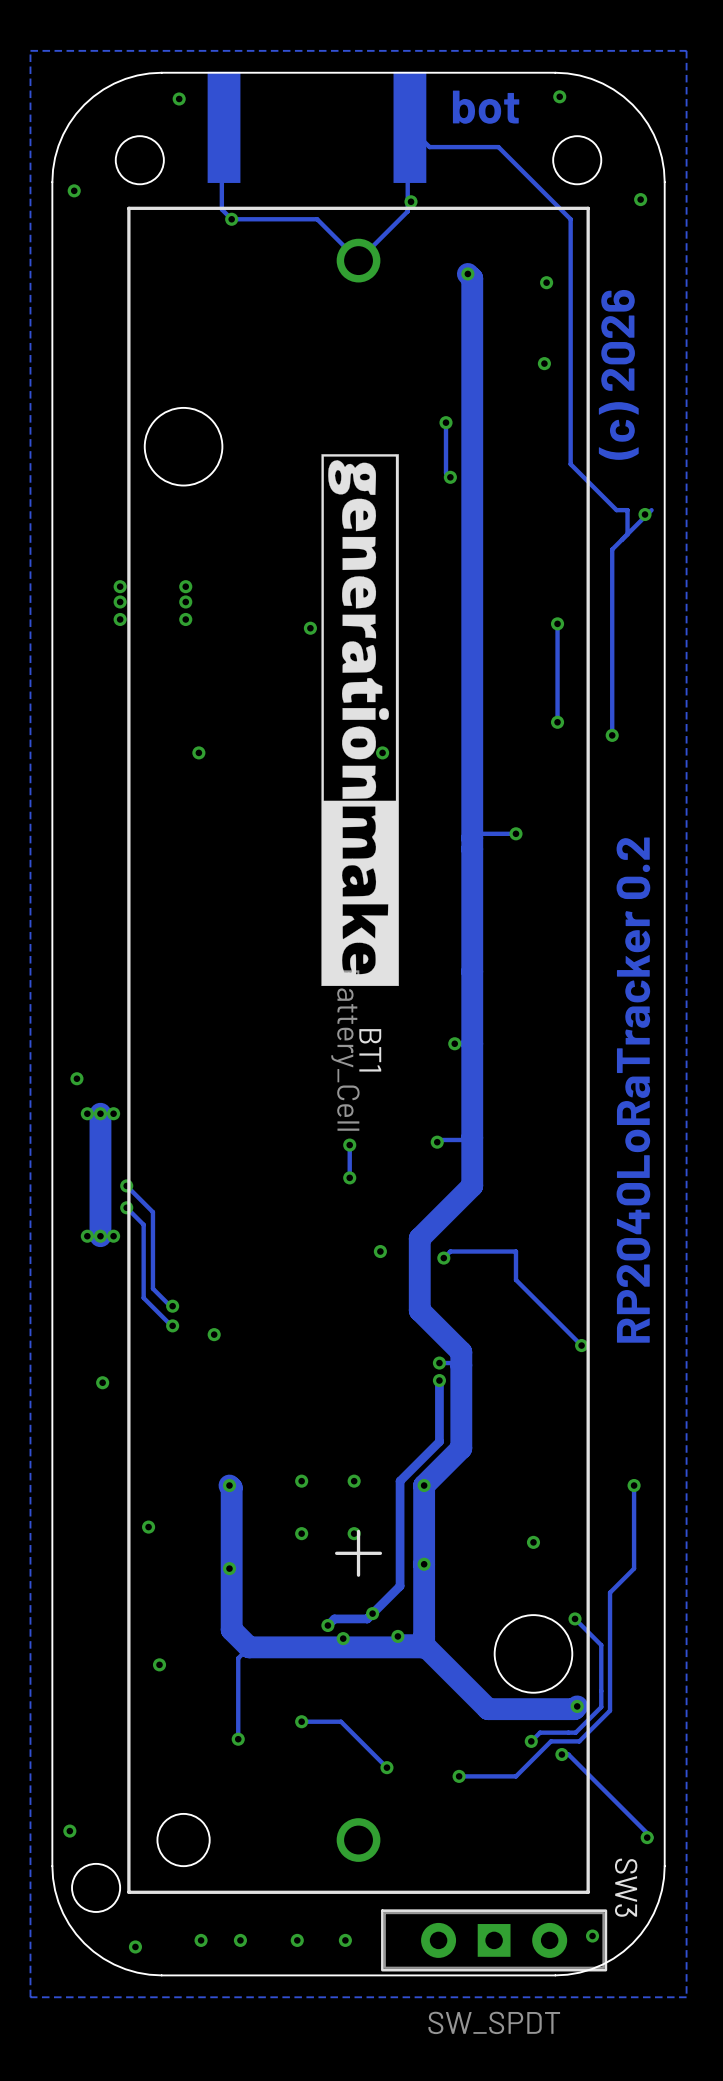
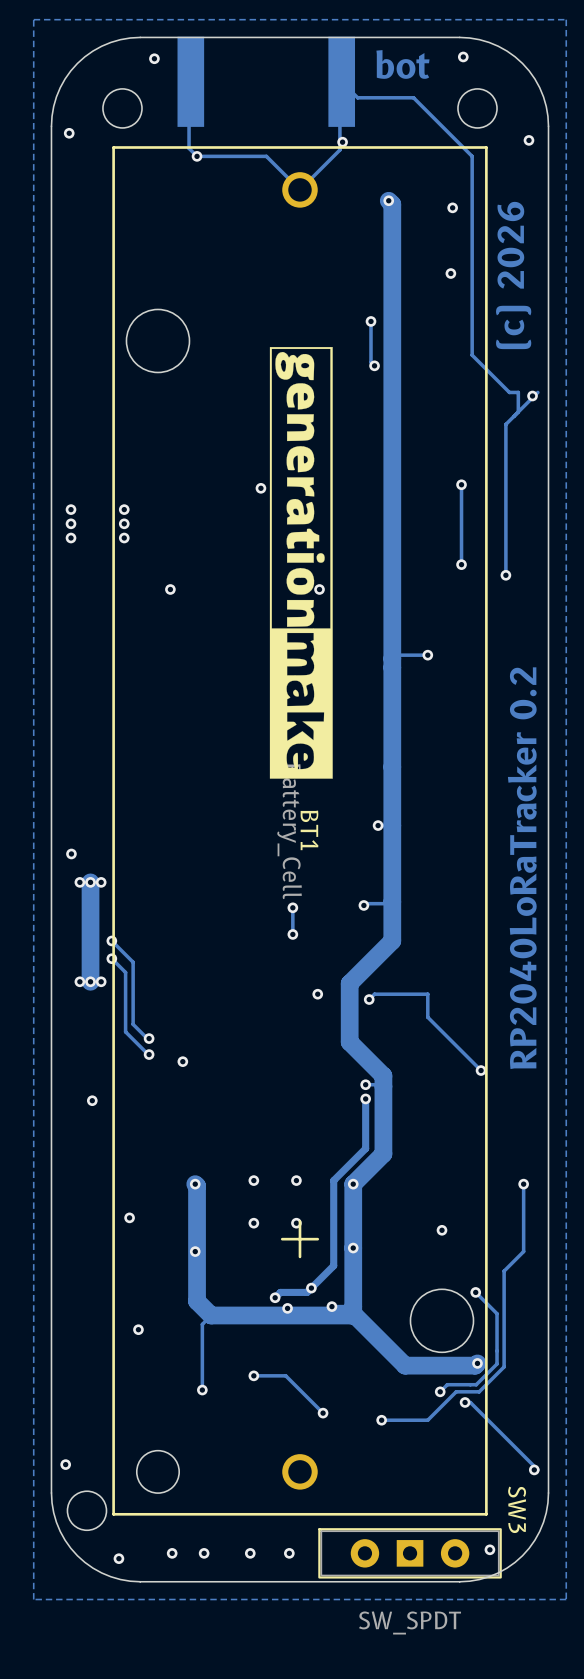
via: (120, 586) -> none
via: (185, 586) -> none
via: (120, 601) -> none
via: (185, 601) -> none
via: (120, 619) -> none
via: (185, 619) -> none
via: none -> (71, 509)
via: none -> (124, 509)
via: none -> (71, 523)
via: none -> (124, 523)
via: none -> (71, 538)
via: none -> (124, 538)

